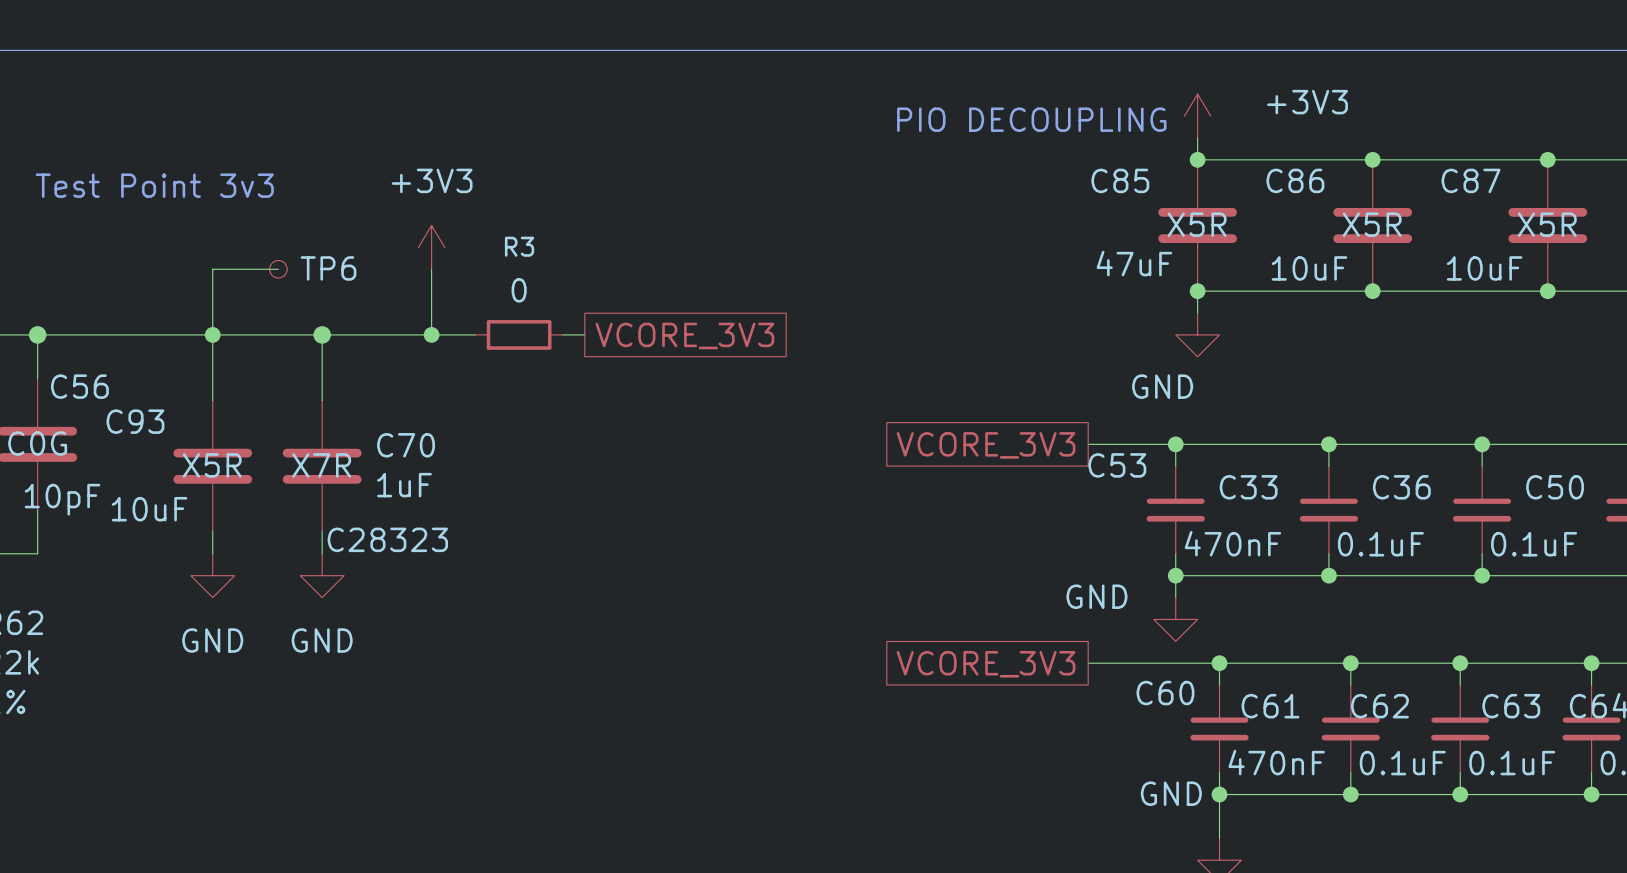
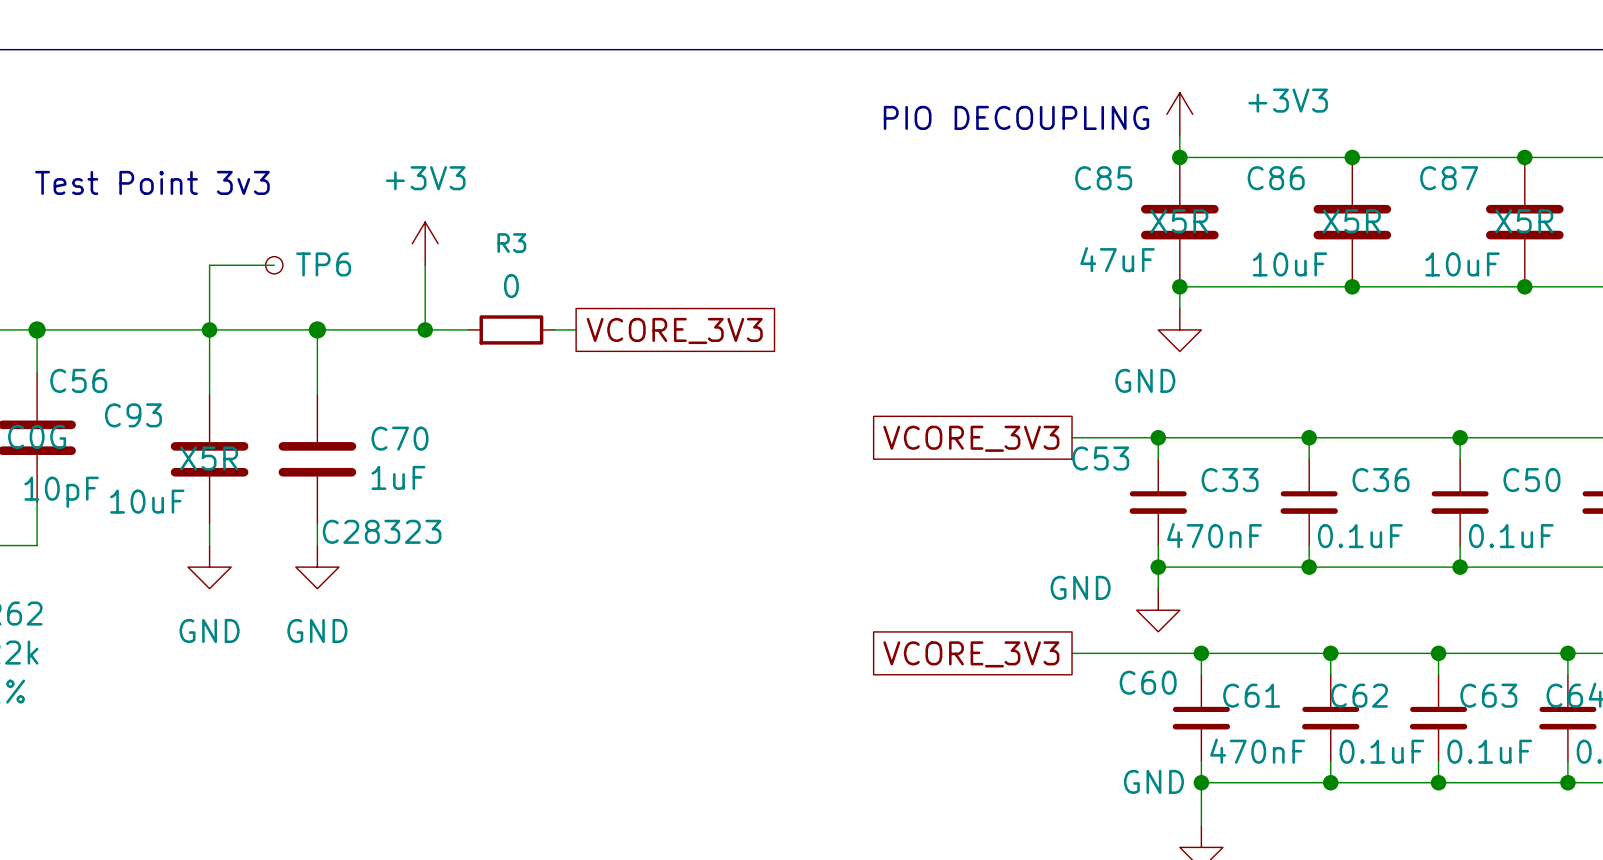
C70 text: X7R (321, 465) -> none

